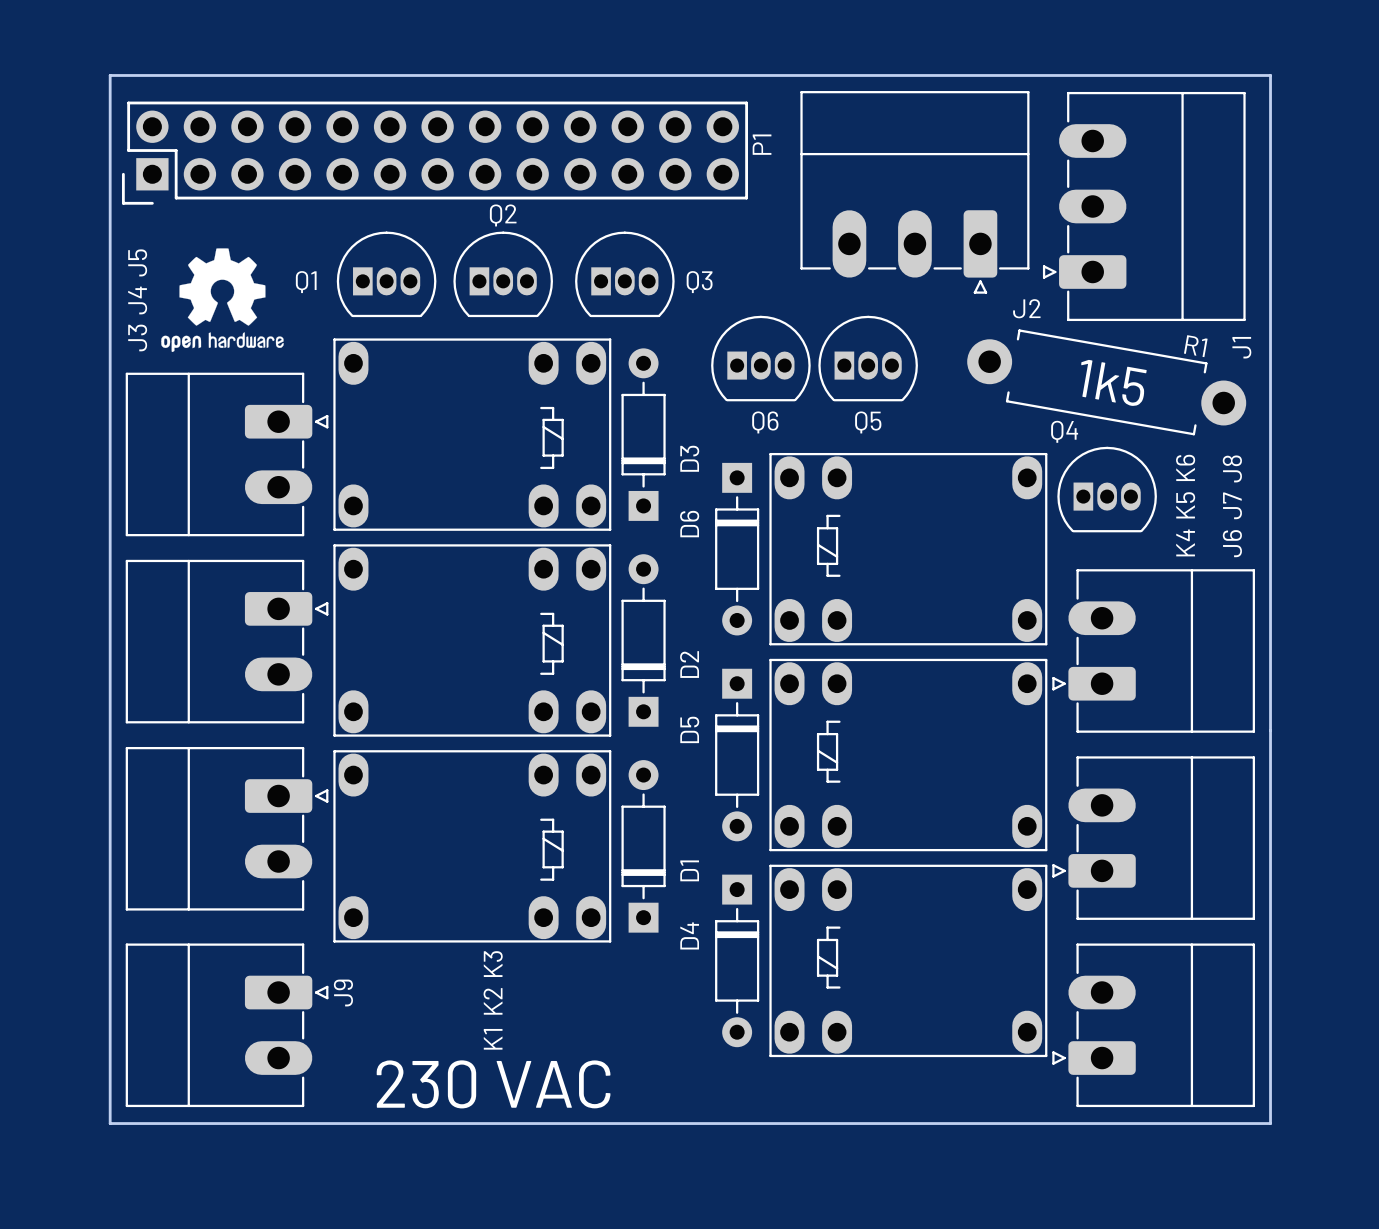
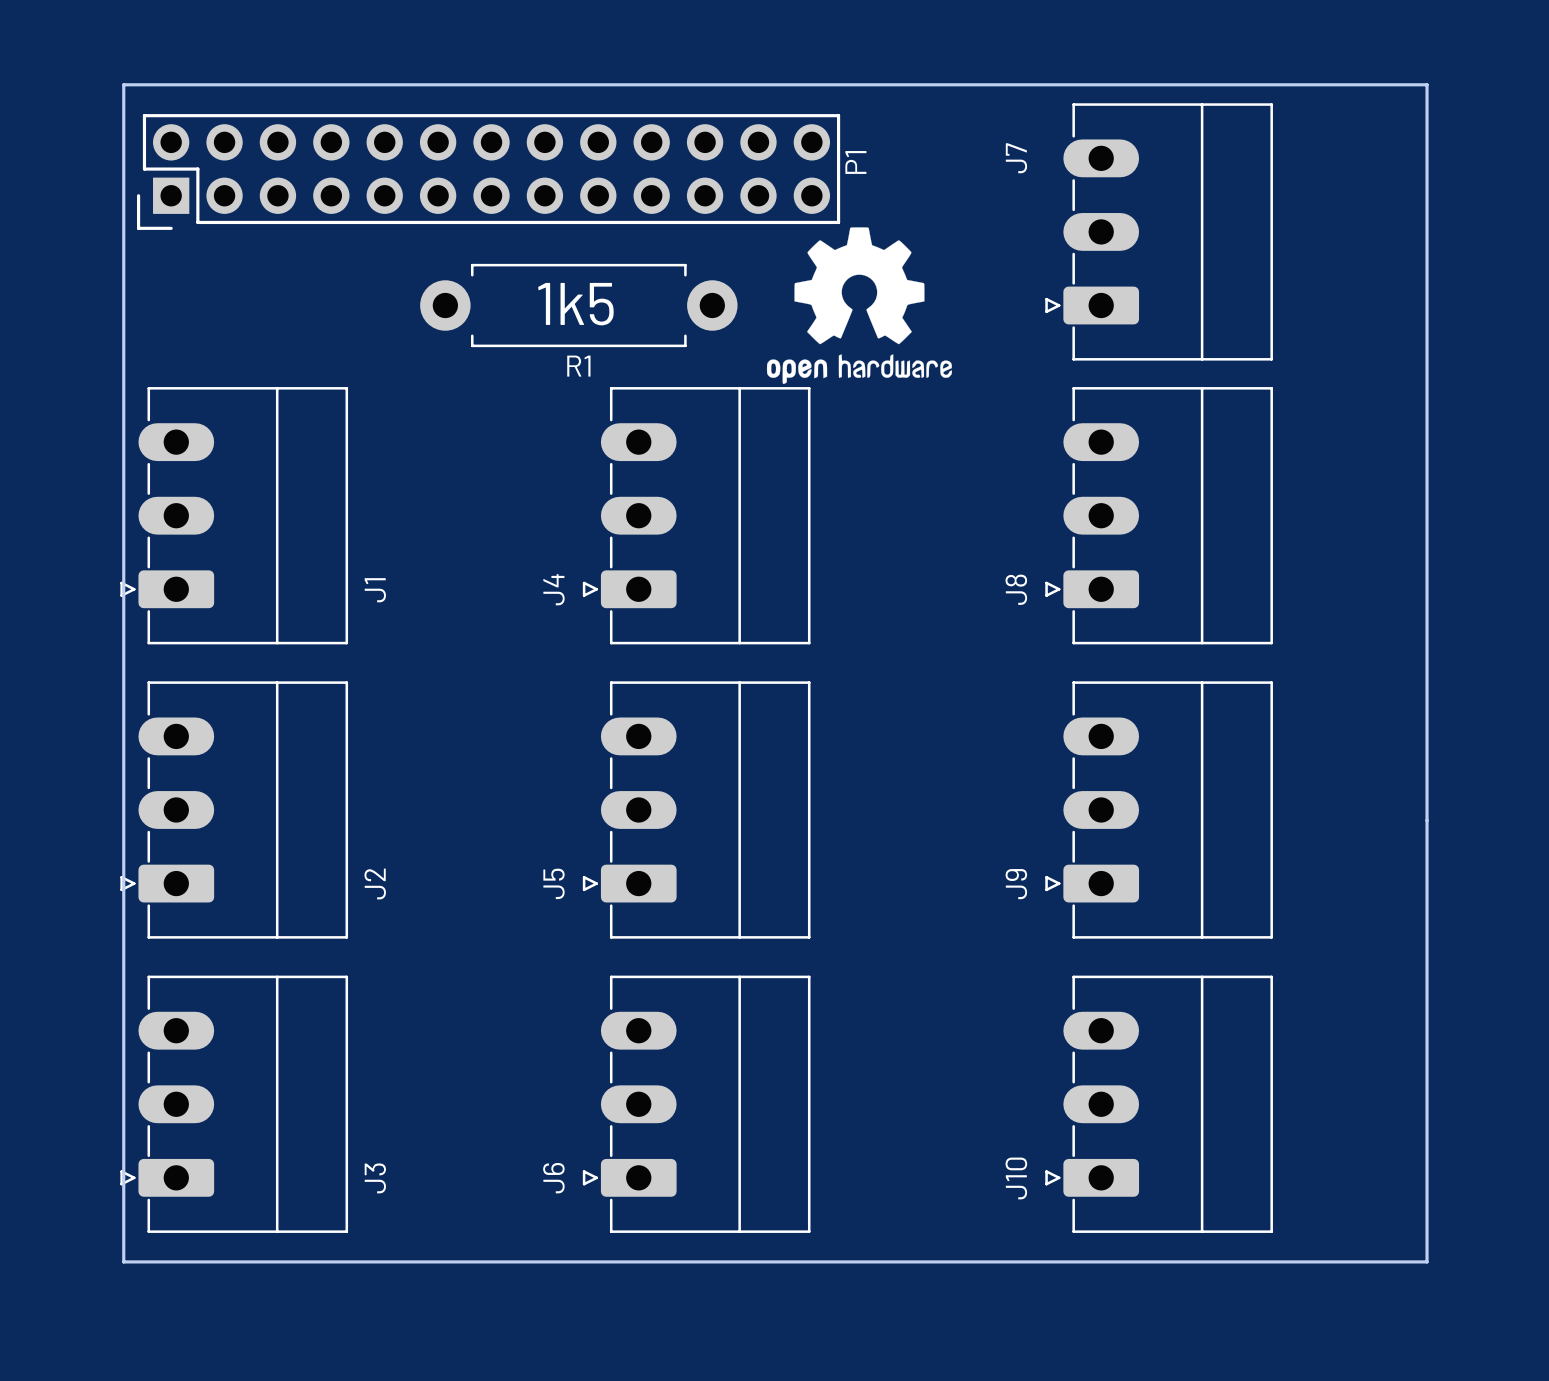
J2 rotation: 0° (914, 192) -> 90° clockwise (234, 809)
J2 position: (914, 192) -> (234, 809)
drawing: none -> [766, 227, 952, 385]
J1 position: (1144, 206) -> (234, 515)
drawing: [161, 248, 284, 353] -> none
J5 name position: J5 (137, 262) -> J5 (554, 883)
text: none -> 1k5 (575, 304)
Q1: (386, 274) -> none
Q2: (503, 274) -> none
Q3: (624, 274) -> none
J4 name position: J4 (137, 300) -> J4 (554, 589)
J2 name position: J2 (1026, 308) -> J2 (375, 884)
J3 name position: J3 (137, 337) -> J3 (375, 1178)
R1 name position: R1 (1195, 346) -> R1 (578, 366)
J1 name position: J1 (1241, 347) -> J1 (375, 590)
Q6: (760, 358) -> none
Q5: (868, 358) -> none
J5 footprint: [125, 372, 329, 537] -> [582, 681, 811, 939]
R1 rotation: 0° (1106, 382) -> 10° counterclockwise (578, 305)
R1 position: (1106, 382) -> (578, 305)
text: 1k5 (1114, 383) -> none
K3: (472, 434) -> none
D3: (643, 434) -> none
J8 name position: J8 (1232, 468) -> J8 (1016, 589)
Q4: (1107, 489) -> none
J7 name position: J7 (1232, 505) -> J7 (1016, 158)
J6 name position: J6 (1232, 543) -> J6 (553, 1178)
D6: (737, 549) -> none
K6: (908, 549) -> none
J4 footprint: [125, 559, 329, 724] -> [582, 387, 811, 645]
J8 footprint: [1052, 569, 1255, 733] -> [1045, 387, 1273, 645]
K2: (472, 640) -> none
D2: (643, 640) -> none
J3 footprint: [125, 746, 329, 911] -> [120, 975, 349, 1233]
D5: (737, 755) -> none
K5: (908, 755) -> none
J7 footprint: [1052, 756, 1255, 920] -> [1045, 103, 1273, 361]
K1: (472, 846) -> none
D1: (643, 846) -> none
J9 footprint: [125, 943, 329, 1108] -> [1045, 681, 1273, 939]
J6 footprint: [1052, 943, 1255, 1108] -> [582, 975, 811, 1233]
D4: (737, 960) -> none
K4: (908, 960) -> none
J10: none -> (1159, 1104)
J9 name position: J9 (343, 993) -> J9 (1016, 884)
text: 230 VAC (493, 1084) -> none

